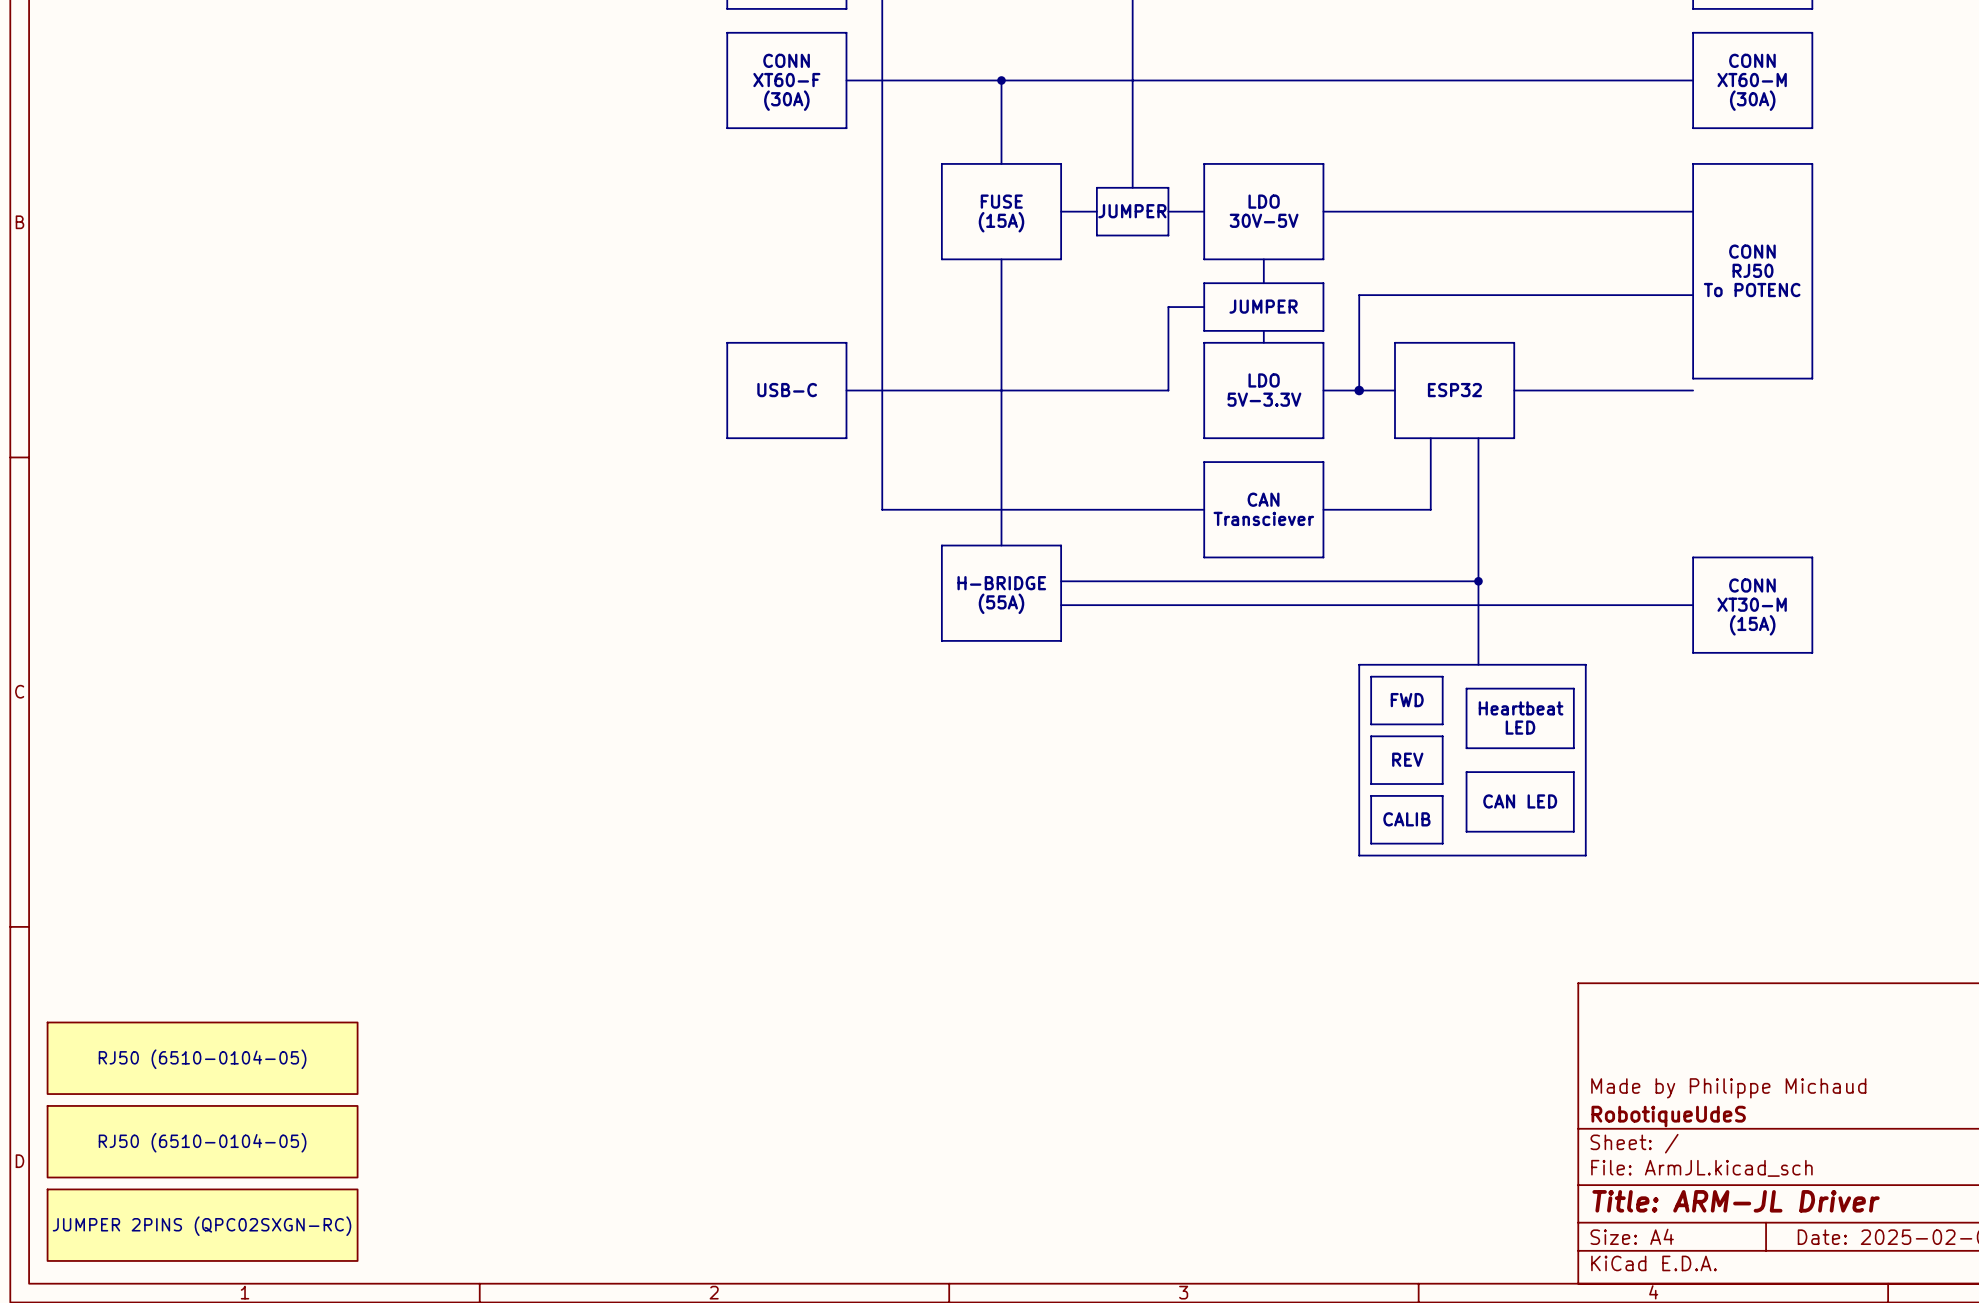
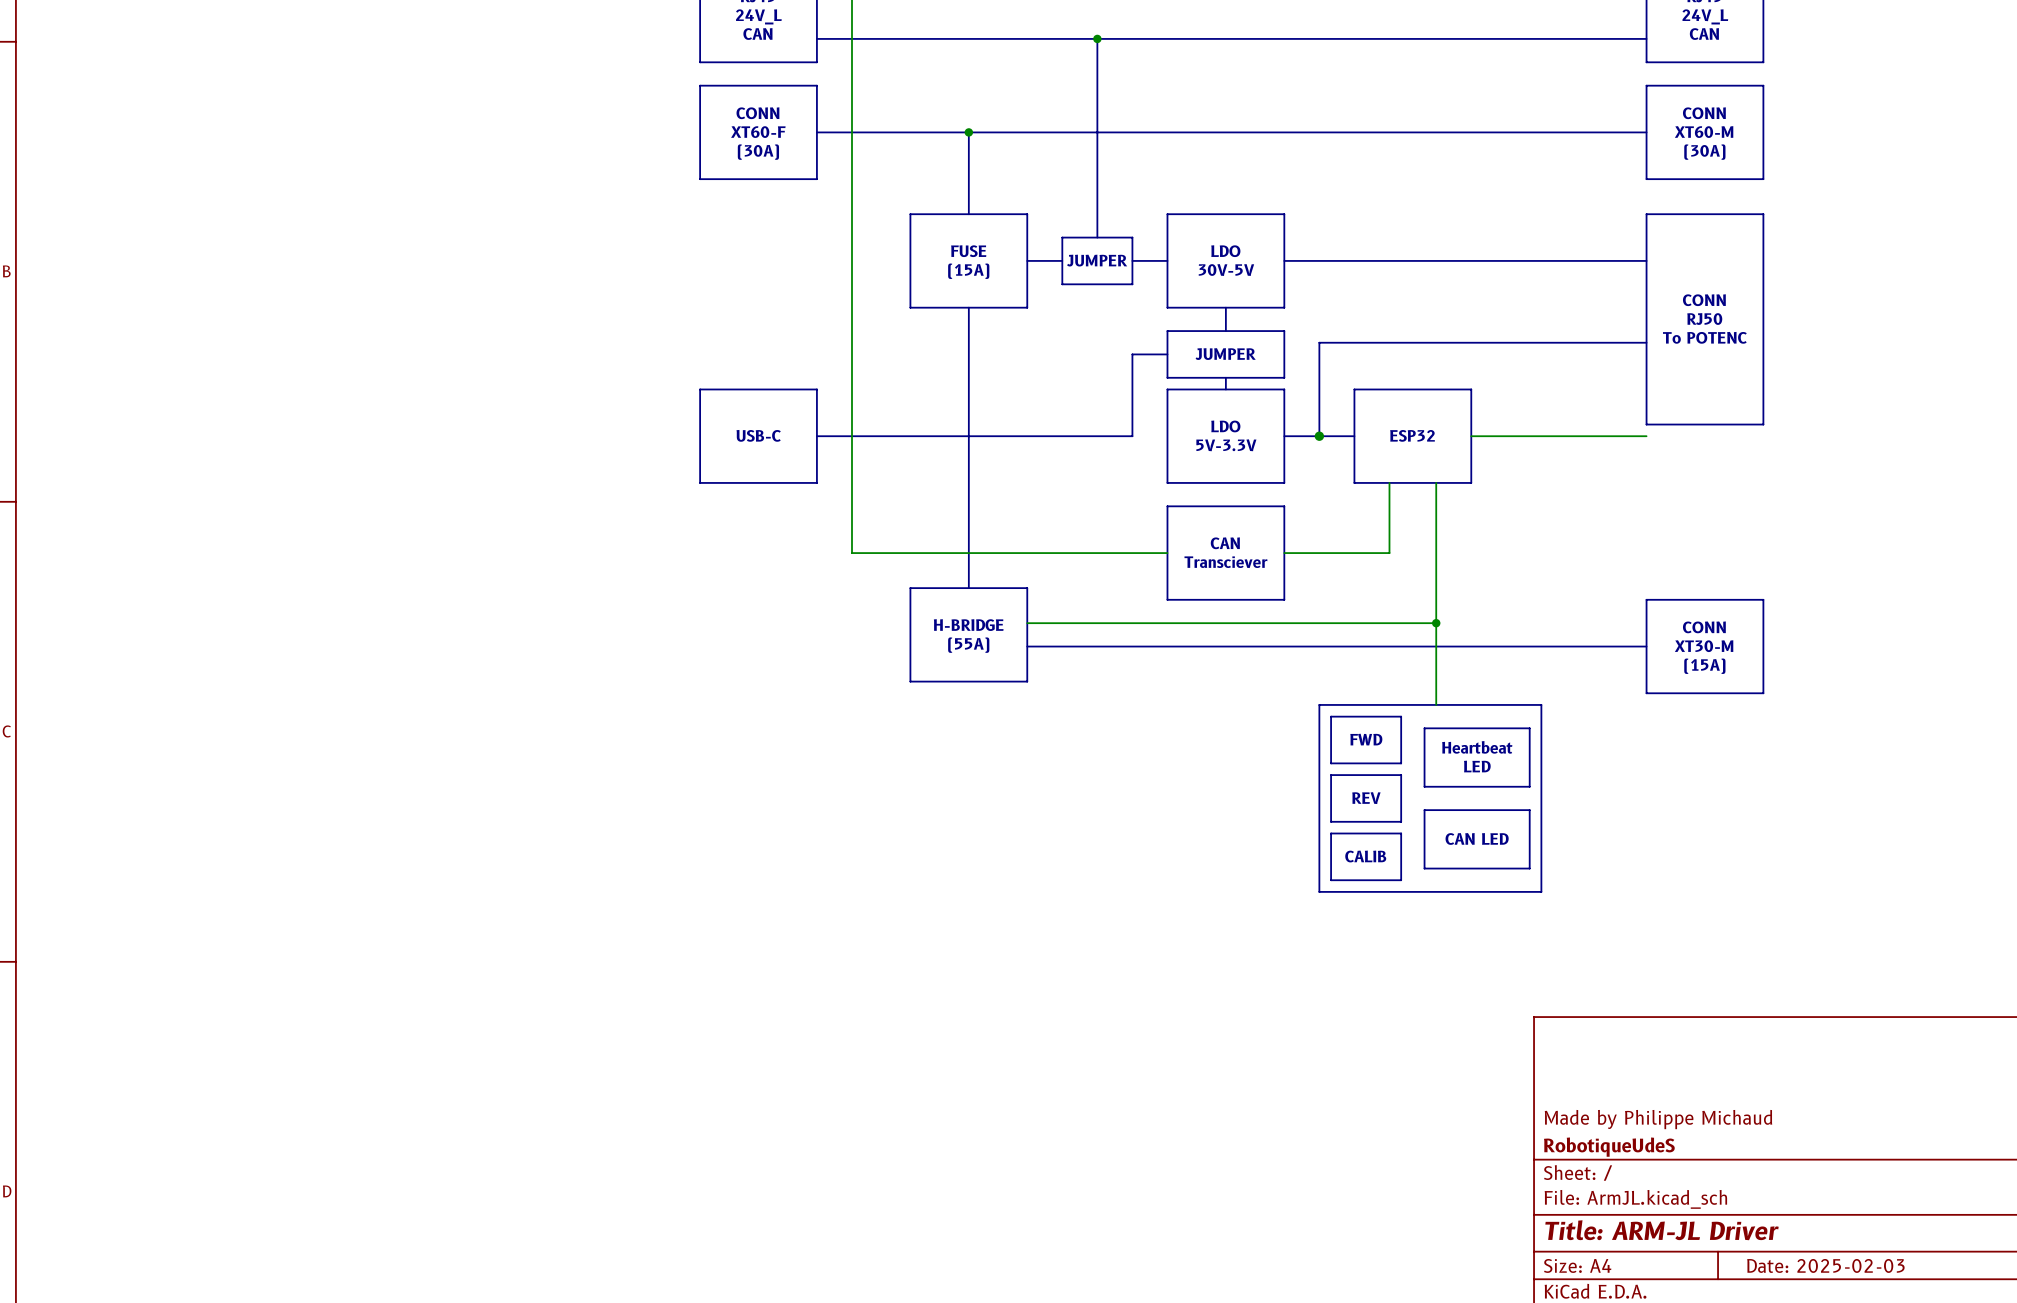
part: RJ50 (6510-0104-05) (202, 1058) -> none
part: RJ50 (6510-0104-05) (202, 1141) -> none
part: JUMPER 2PINS (QPC02SXGN-RC) (202, 1225) -> none

